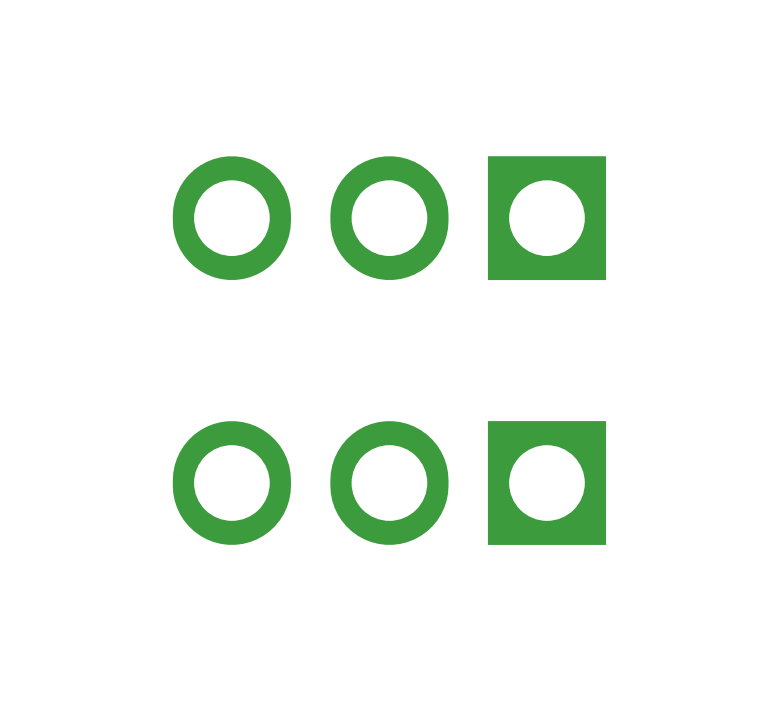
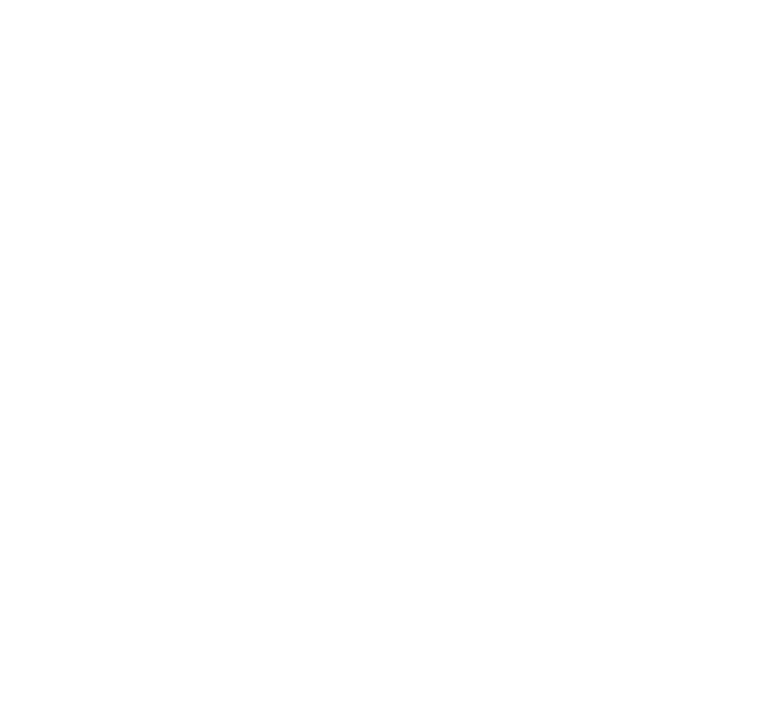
part: (389, 218) -> none
part: (389, 483) -> none

